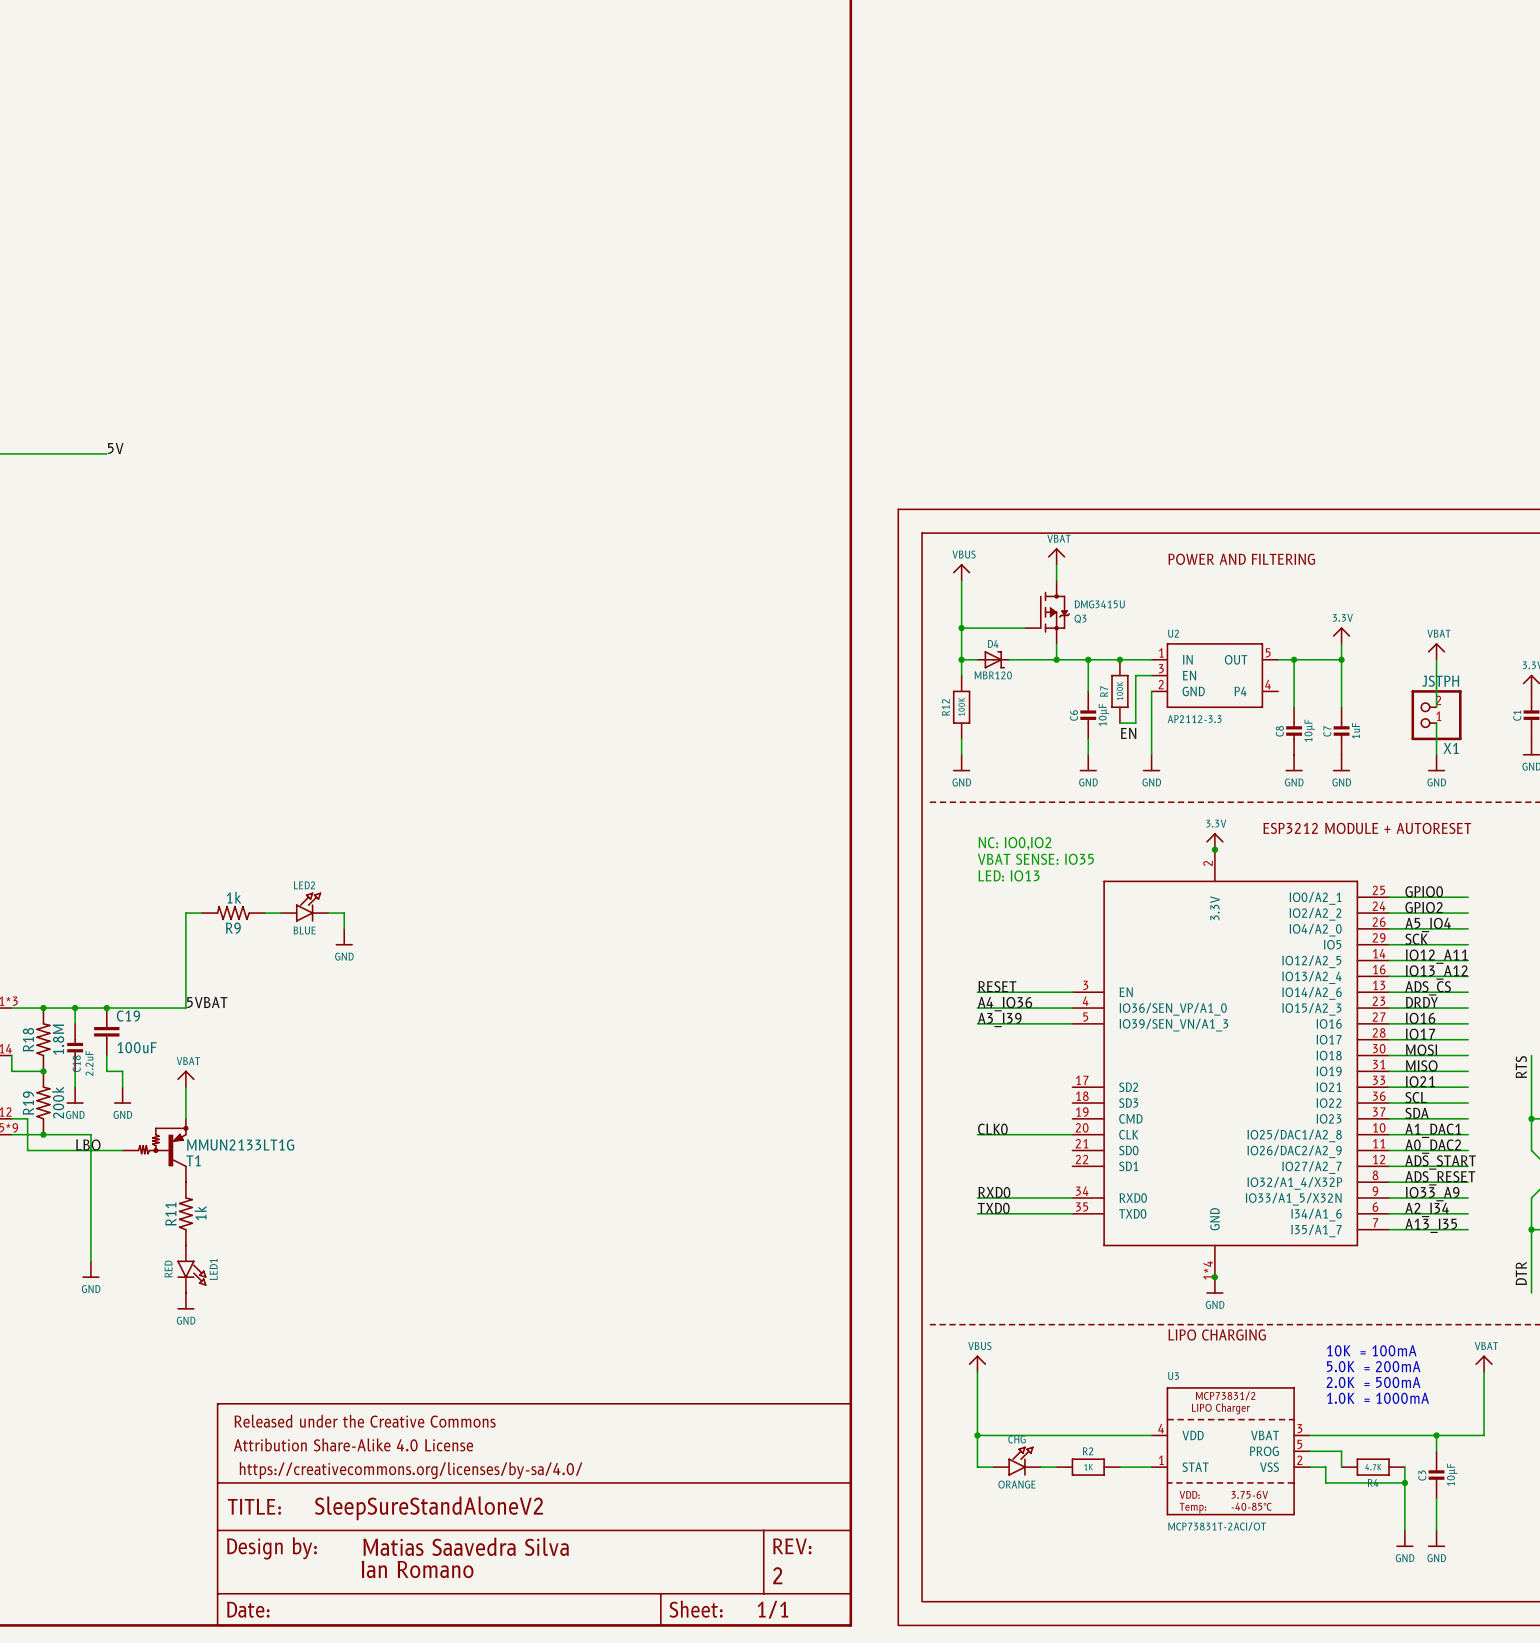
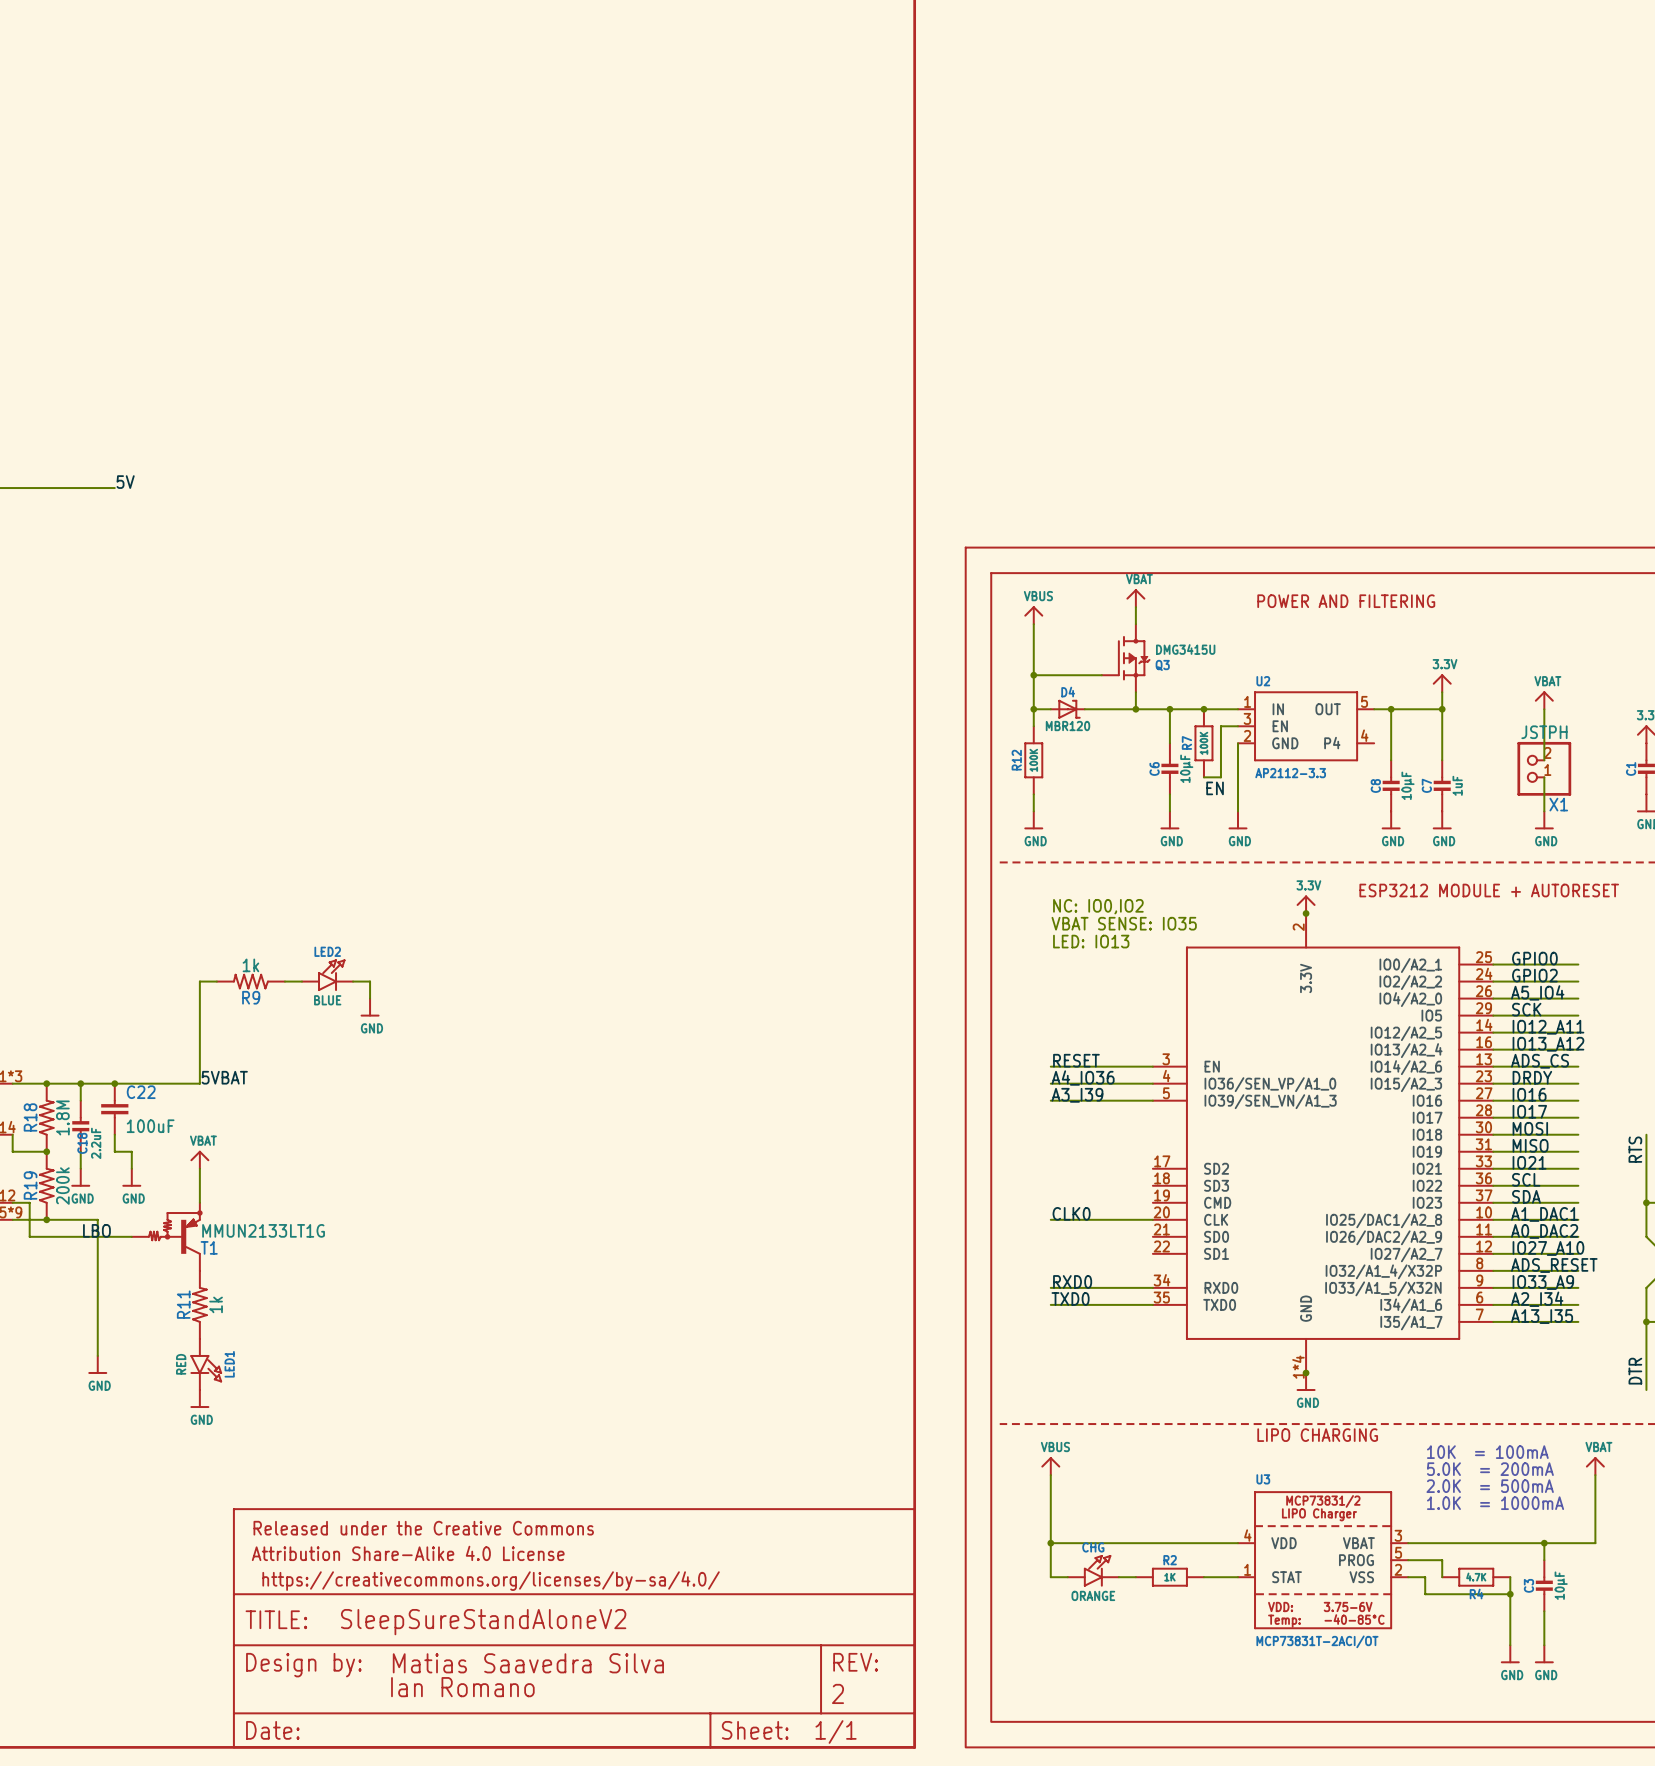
C19 name: C19 (128, 1016) -> C22 (141, 1092)
label: ADS_START (1440, 1162) -> IO27_A10 (1548, 1248)

